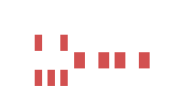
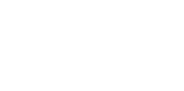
part: (51, 60) -> none
part: (91, 60) -> none
part: (132, 60) -> none

